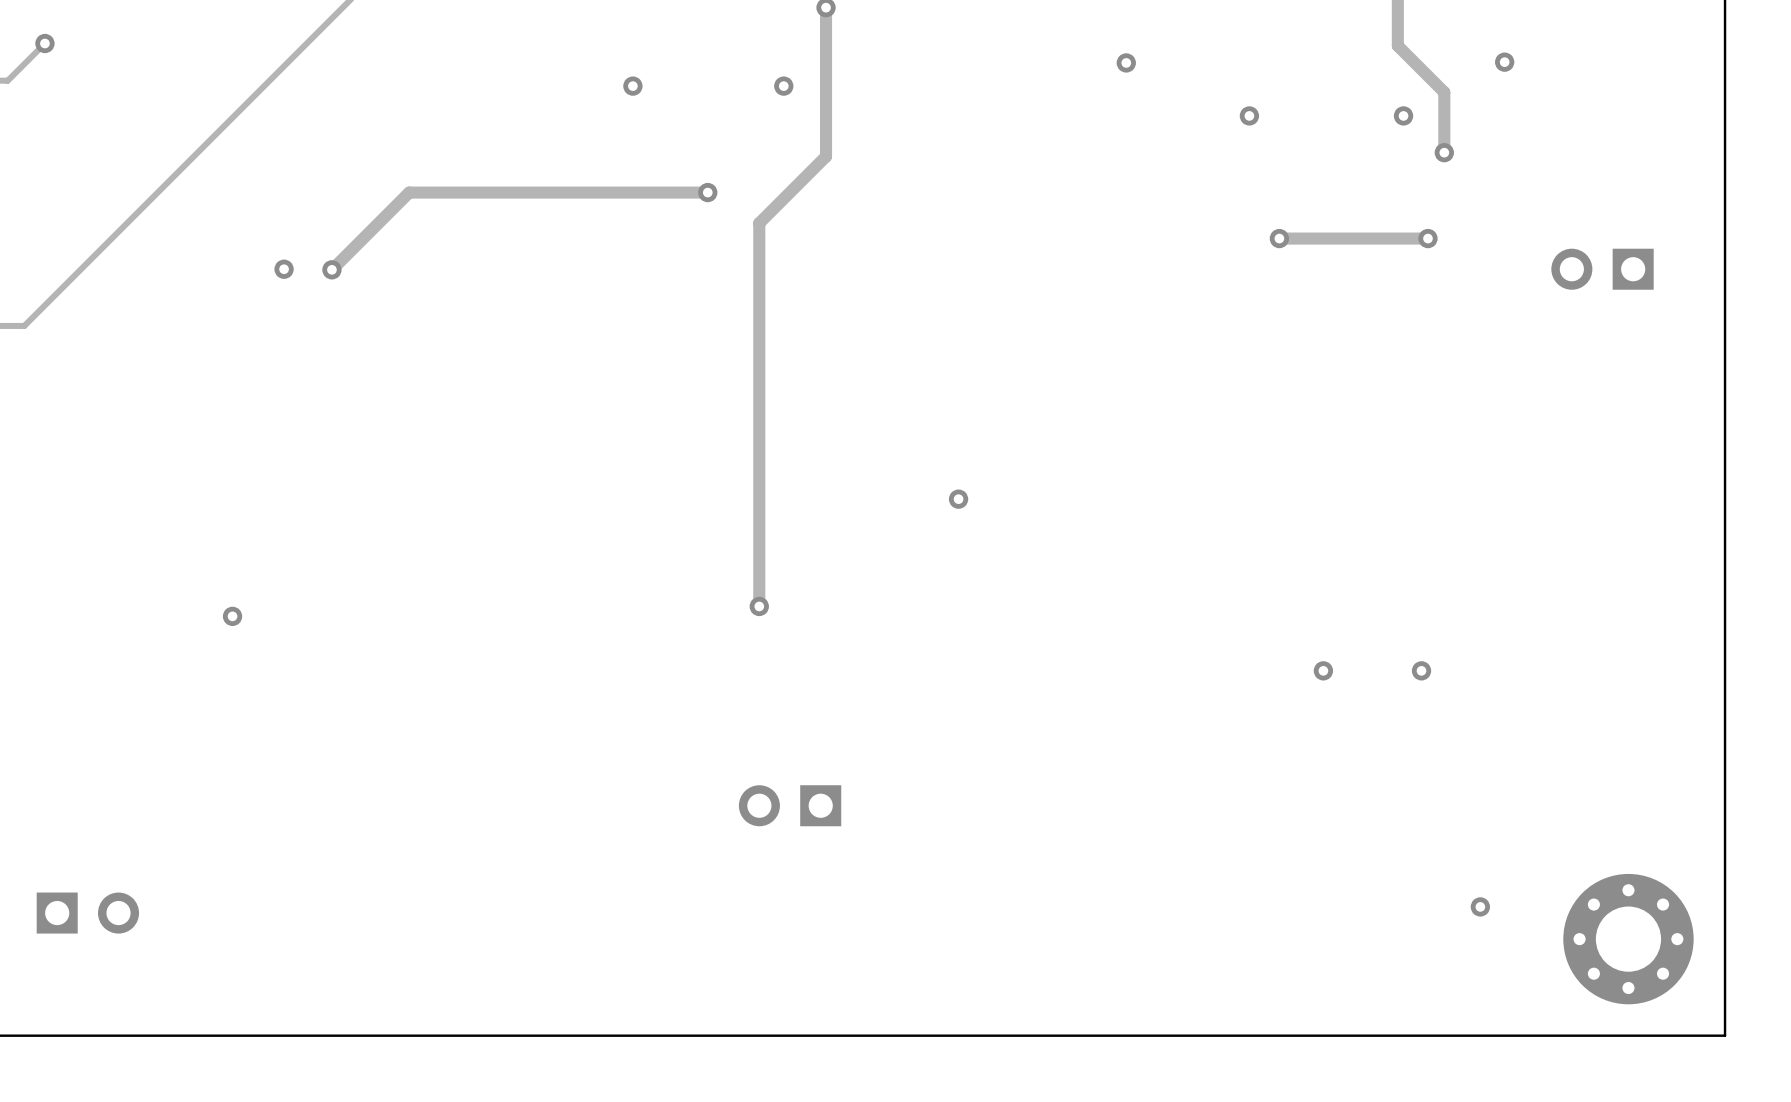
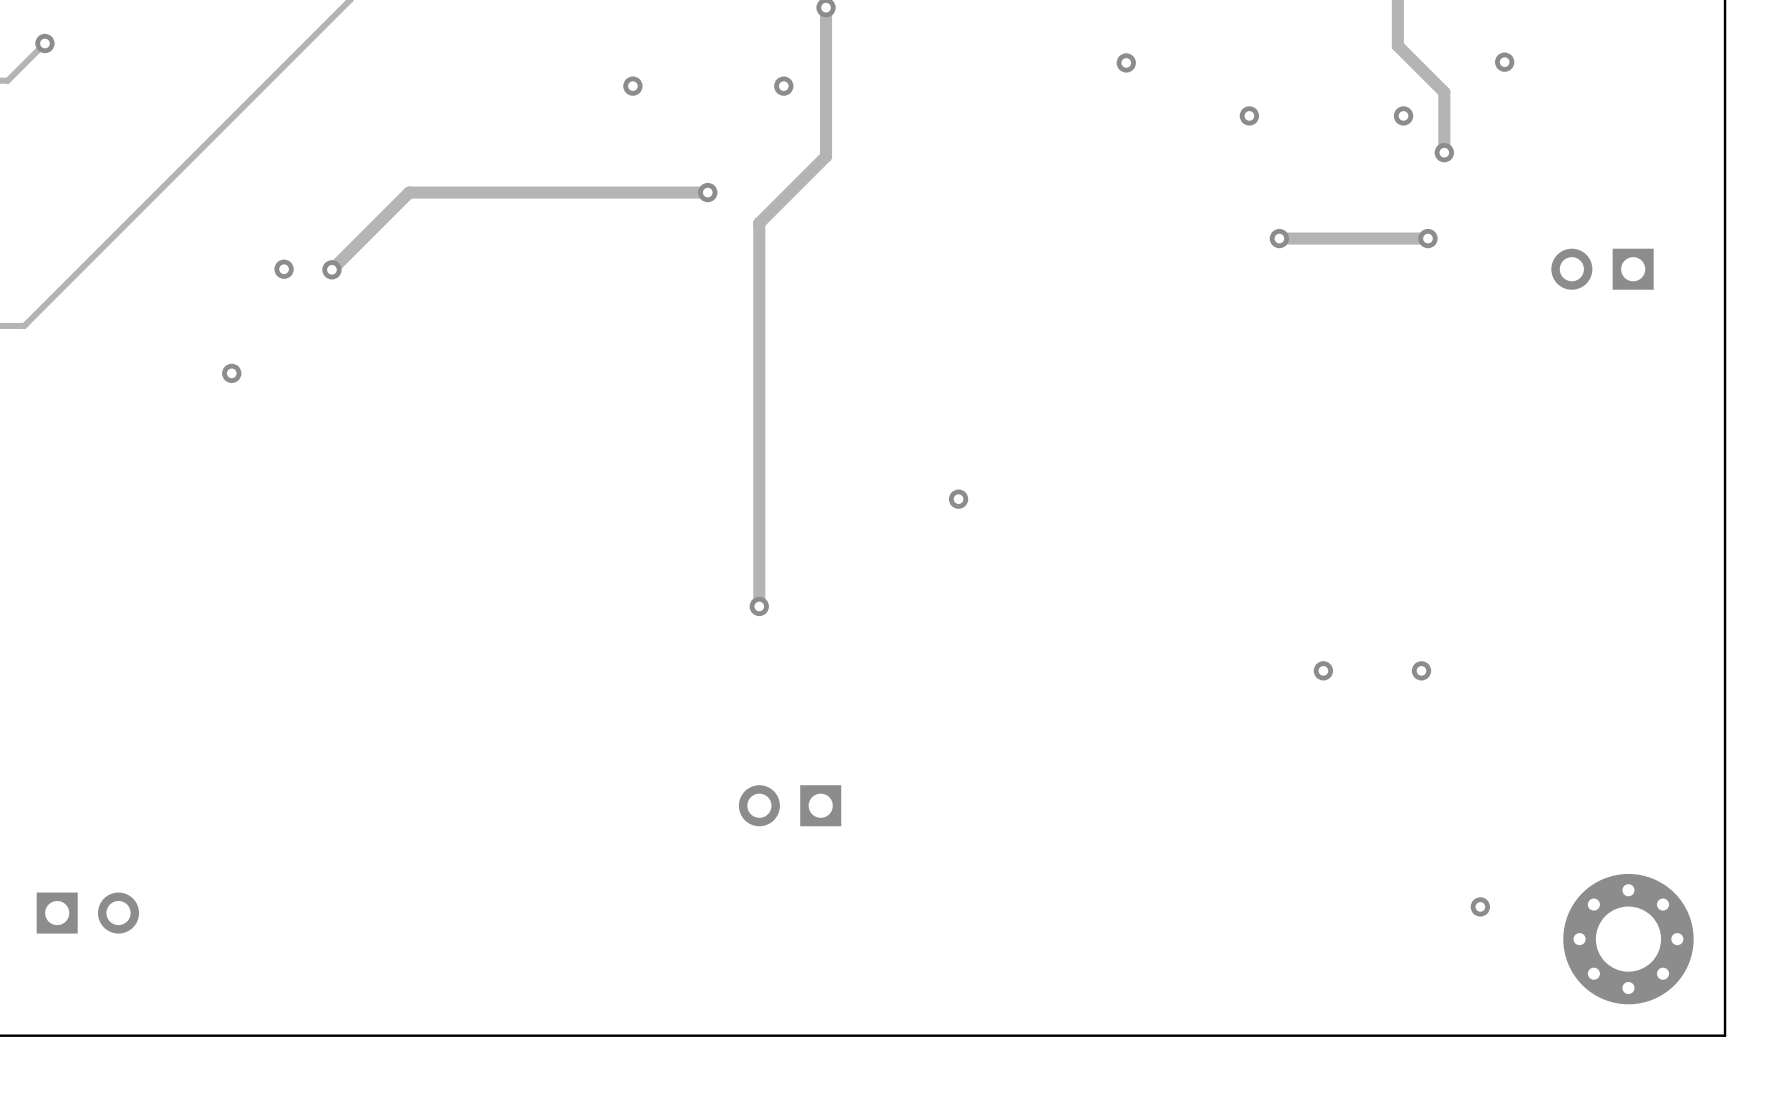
via: none -> (231, 373)
via: (232, 616) -> none

